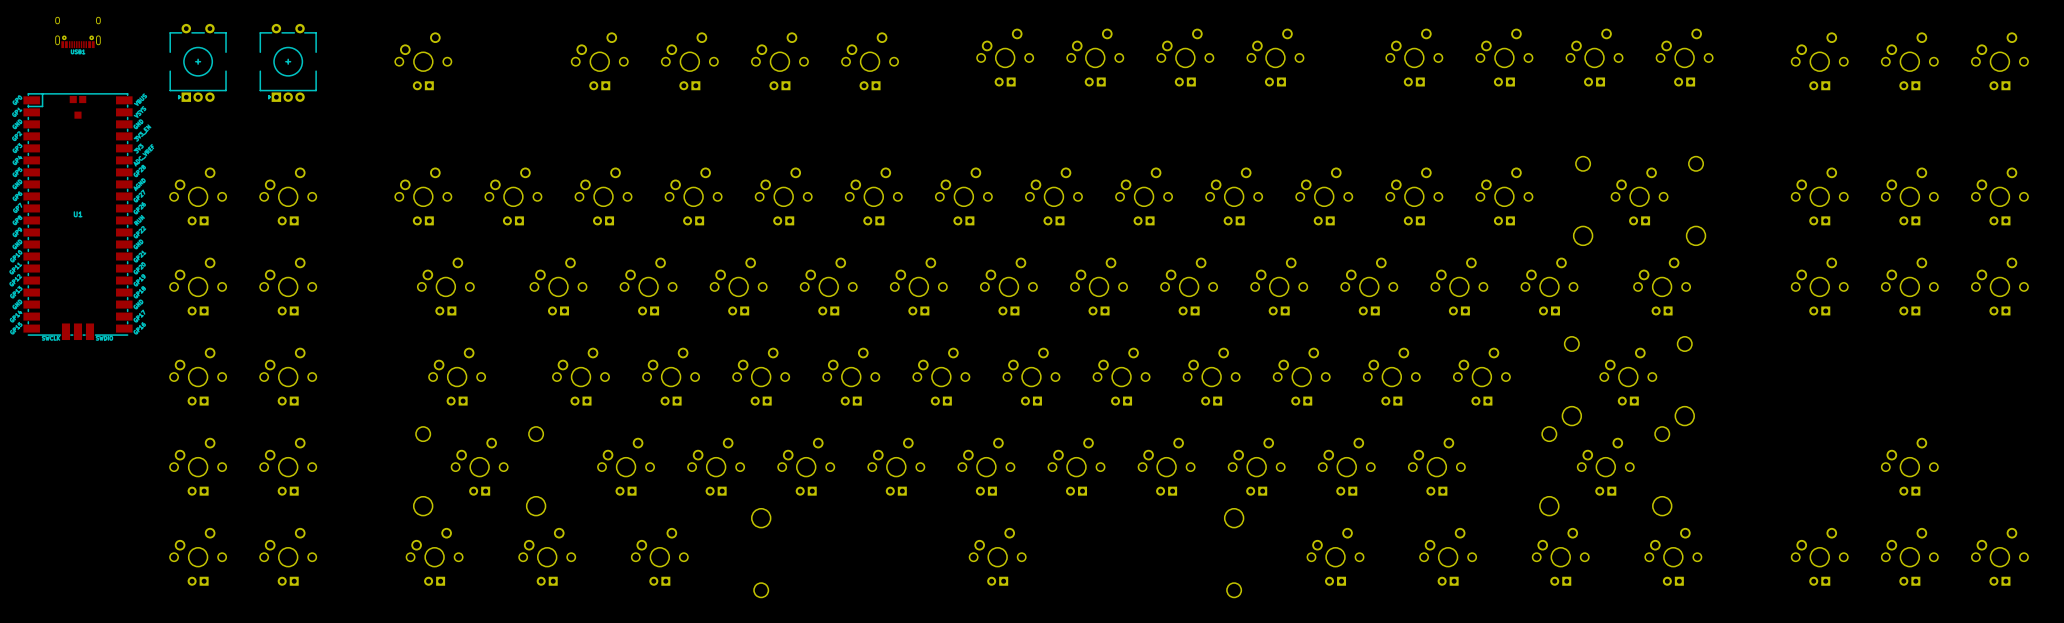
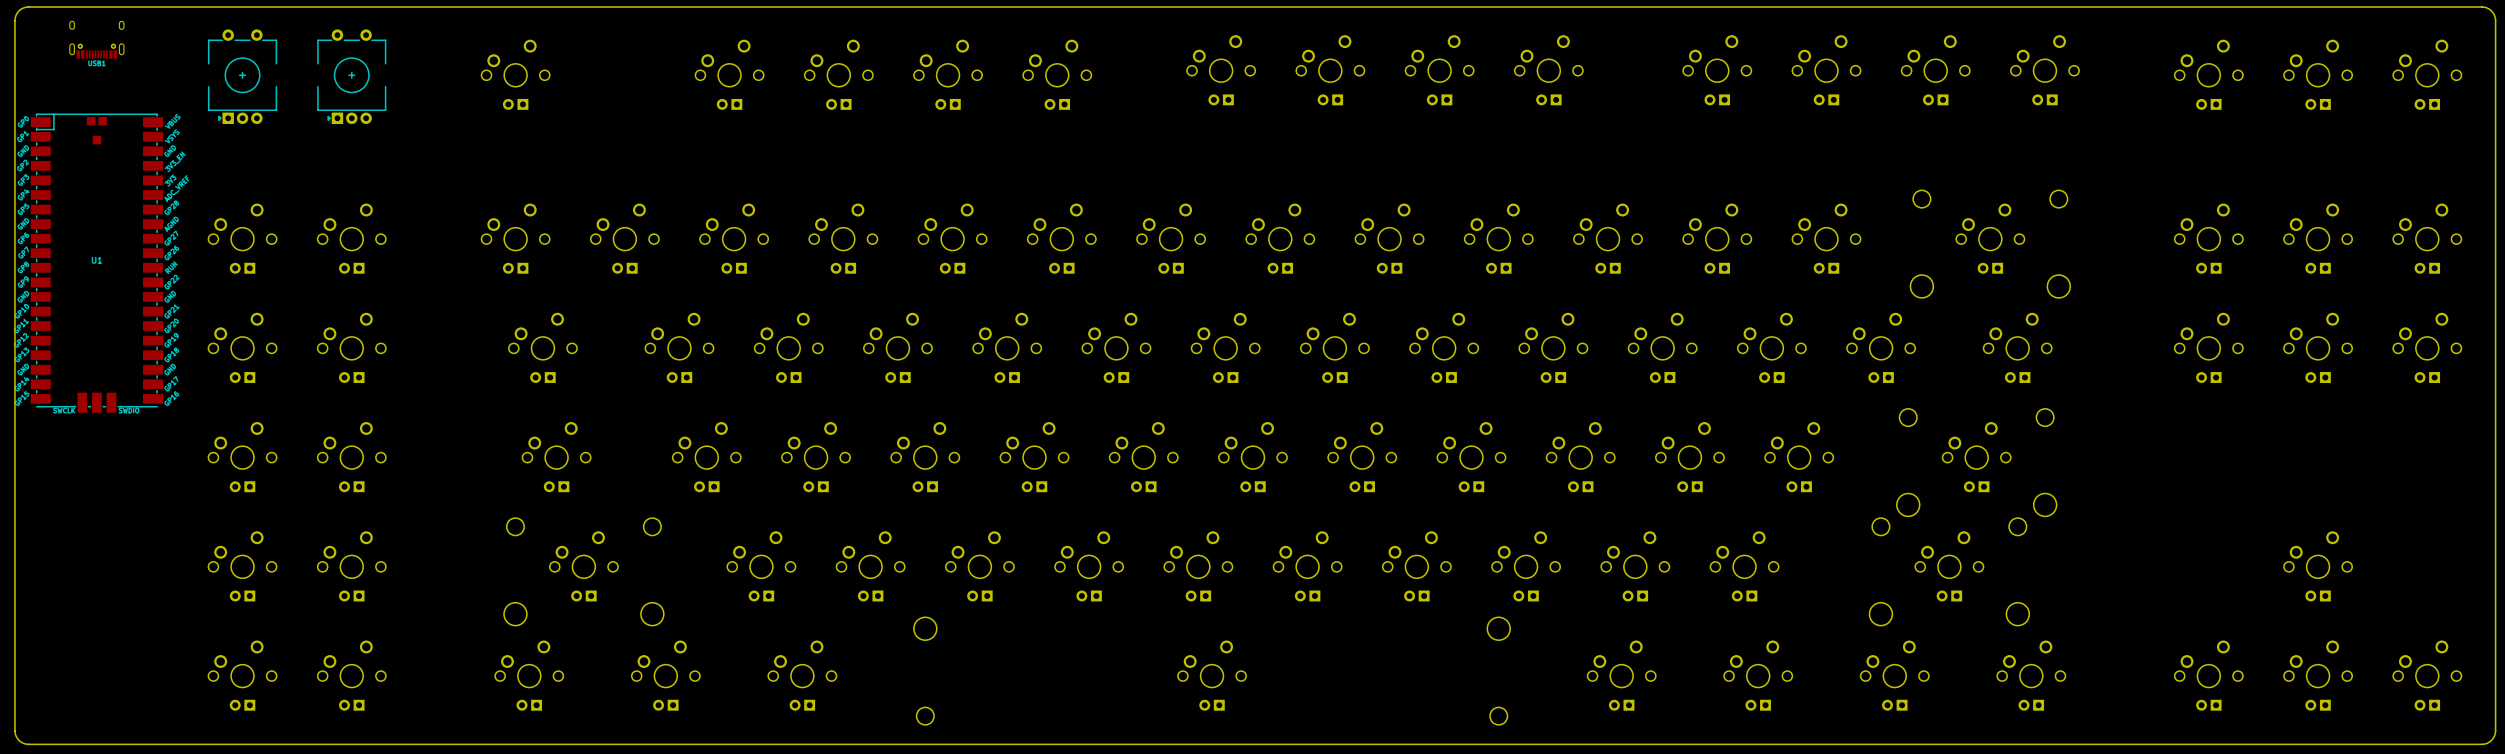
board edge: none -> (28, 7) (2485, 7) (2492, 12) (2495, 20) (2495, 734) (2490, 741) (2481, 744) (25, 743) (17, 739) (14, 730) (14, 20) (18, 11) (28, 7)

